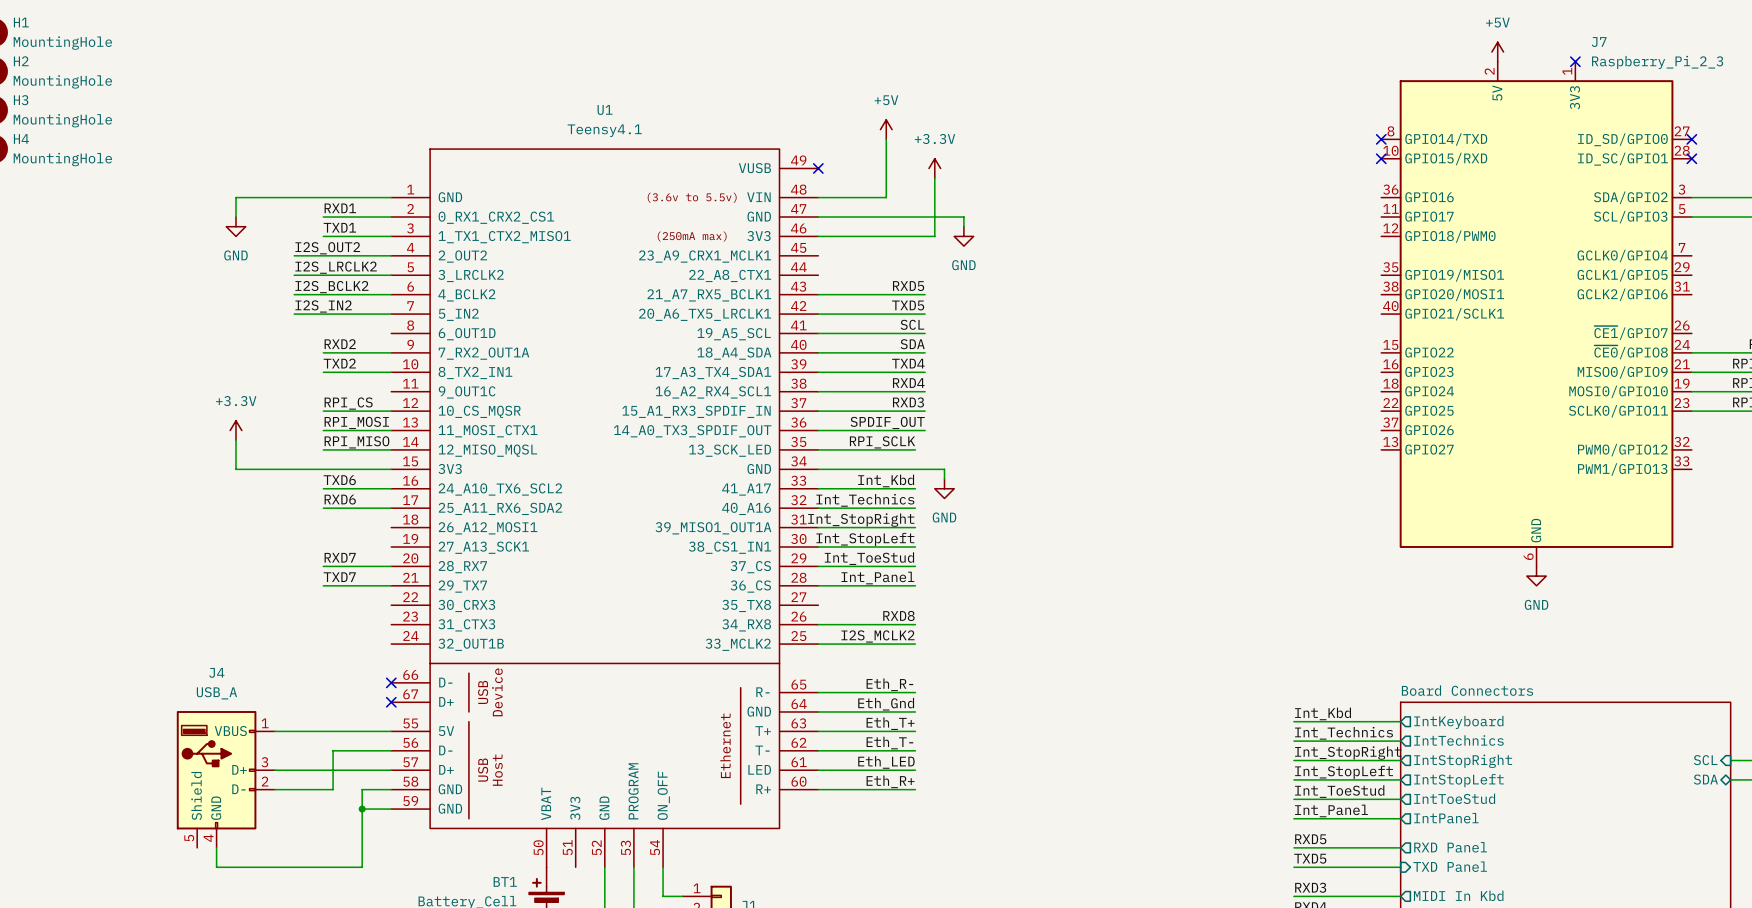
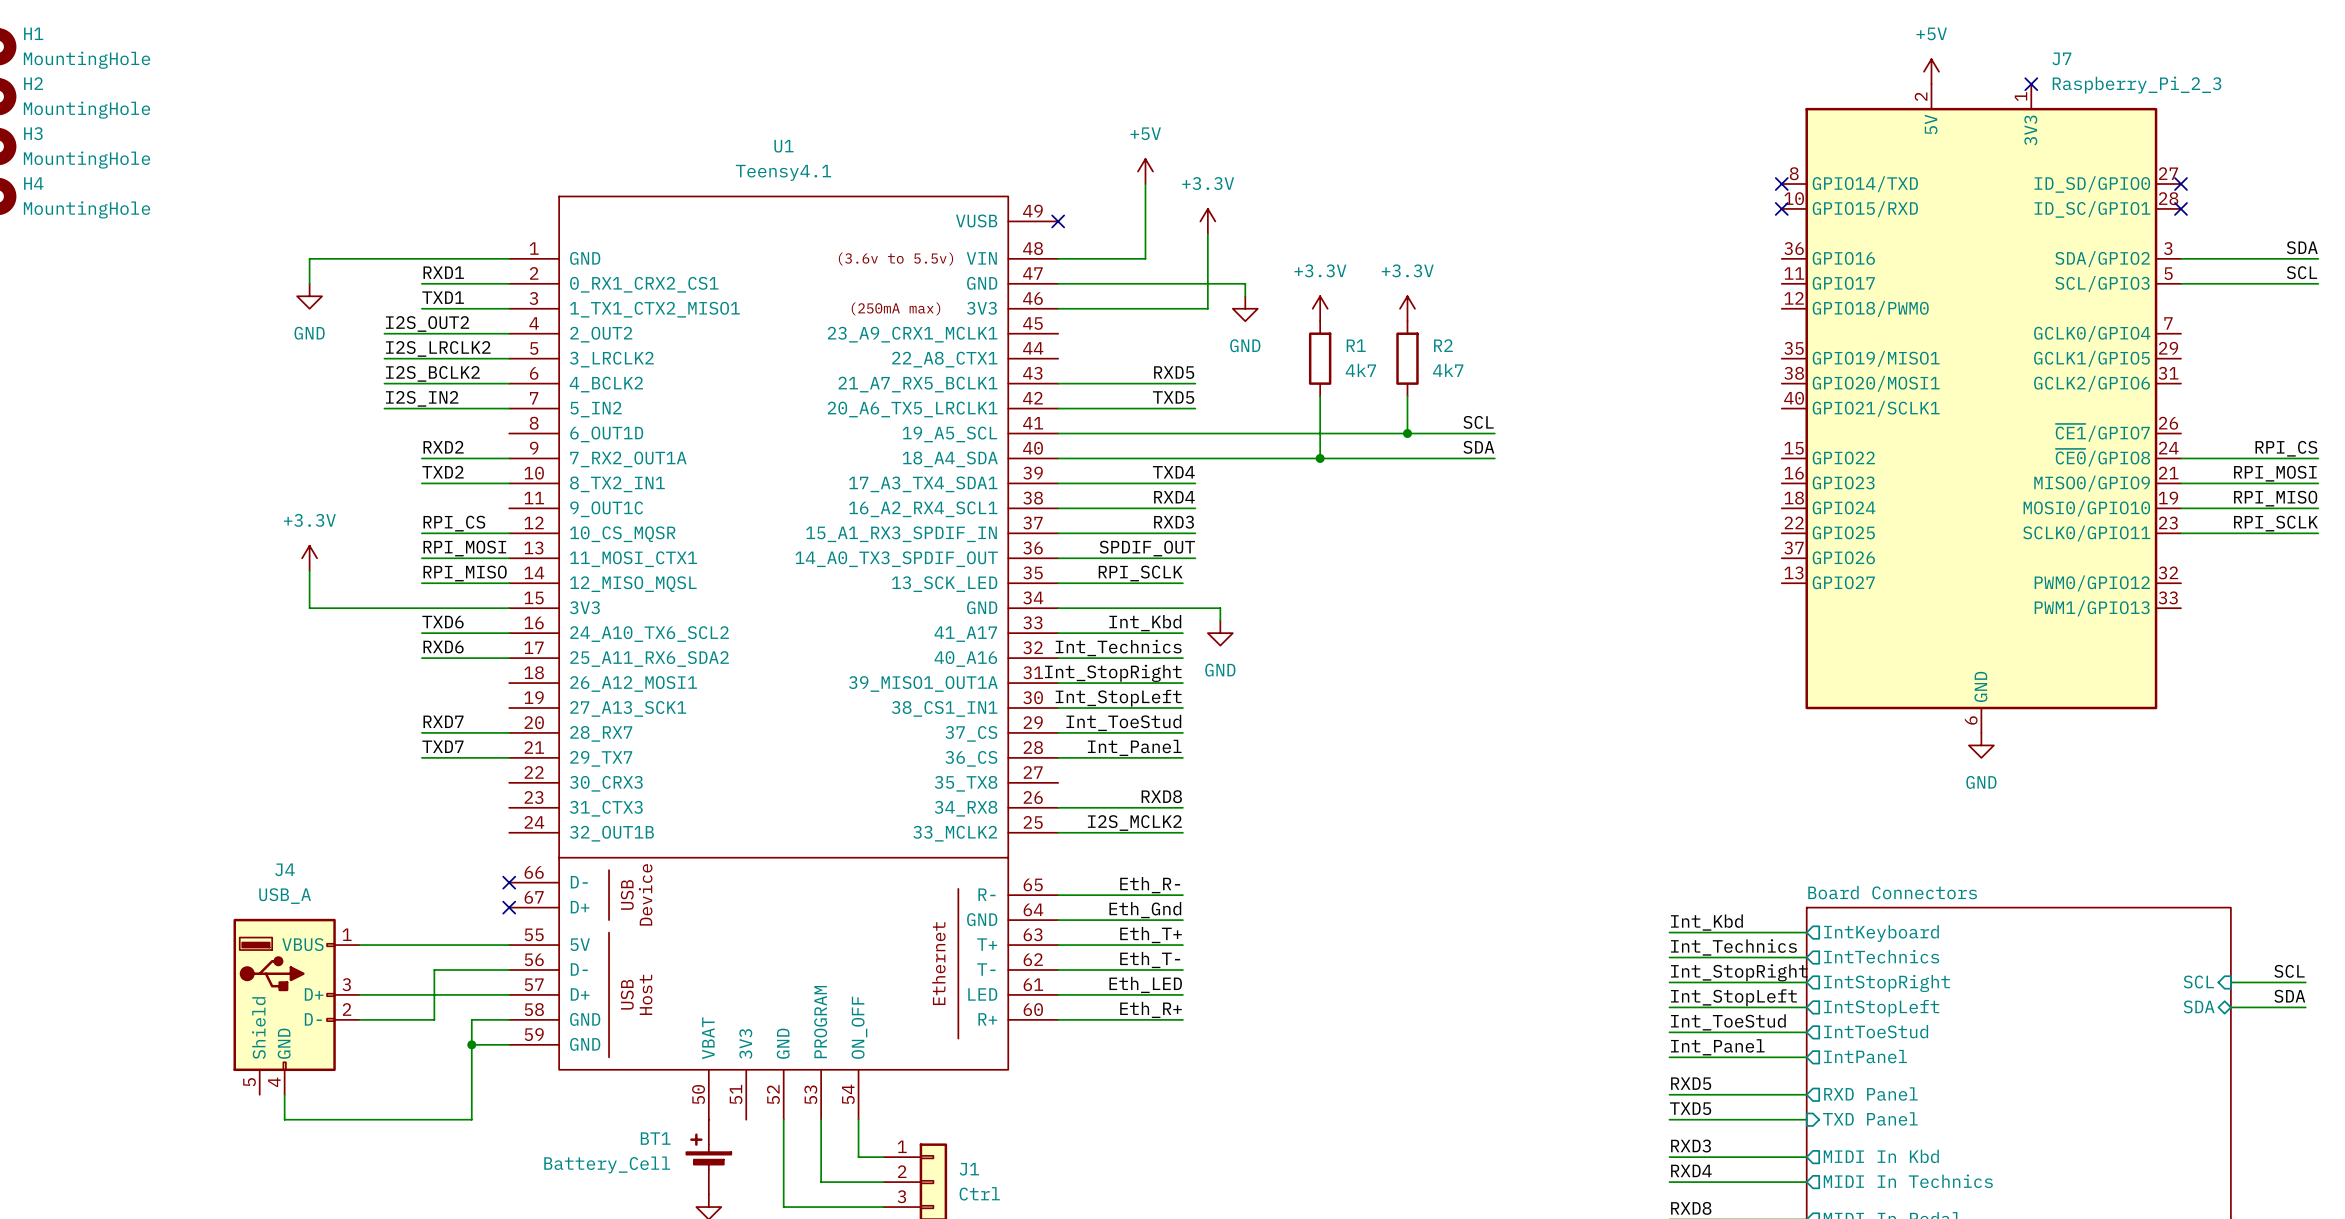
power symbol: none -> +3.3V (1320, 308)
power symbol: none -> +3.3V (1407, 308)
R1: none -> 4k7 (1320, 358)
R2: none -> 4k7 (1407, 358)
wire: none -> (1320, 396) (1320, 458)
wire: none -> (1407, 396) (1407, 433)
label: SCL (912, 324) -> none
label: none -> SCL (1478, 422)
wire: none -> (1195, 433) (1494, 433)
junction: none -> (1407, 433)
label: SDA (912, 344) -> none
label: none -> SDA (1478, 447)
wire: none -> (1195, 458) (1494, 458)
junction: none -> (1320, 458)

